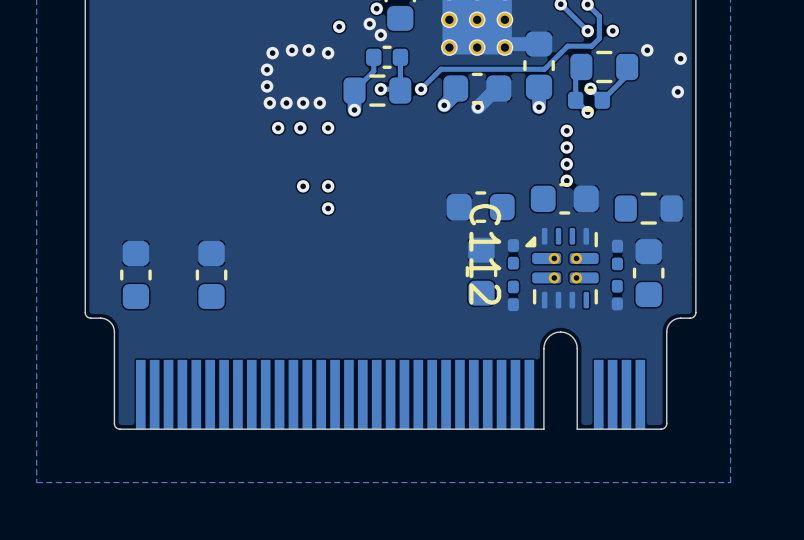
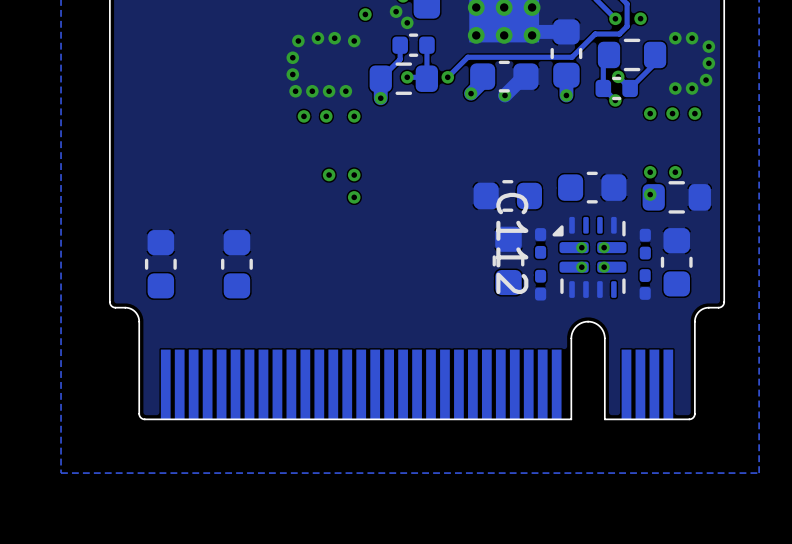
via: none -> (692, 38)
via: none -> (708, 63)
via: none -> (675, 88)
via: none -> (692, 88)
via: none -> (650, 113)
via: none -> (672, 113)
via: none -> (694, 113)
via: (566, 130) -> none
via: (566, 147) -> none
via: (566, 164) -> none
via: (566, 180) -> none
via: none -> (650, 172)
via: none -> (675, 172)
via: none -> (650, 194)

